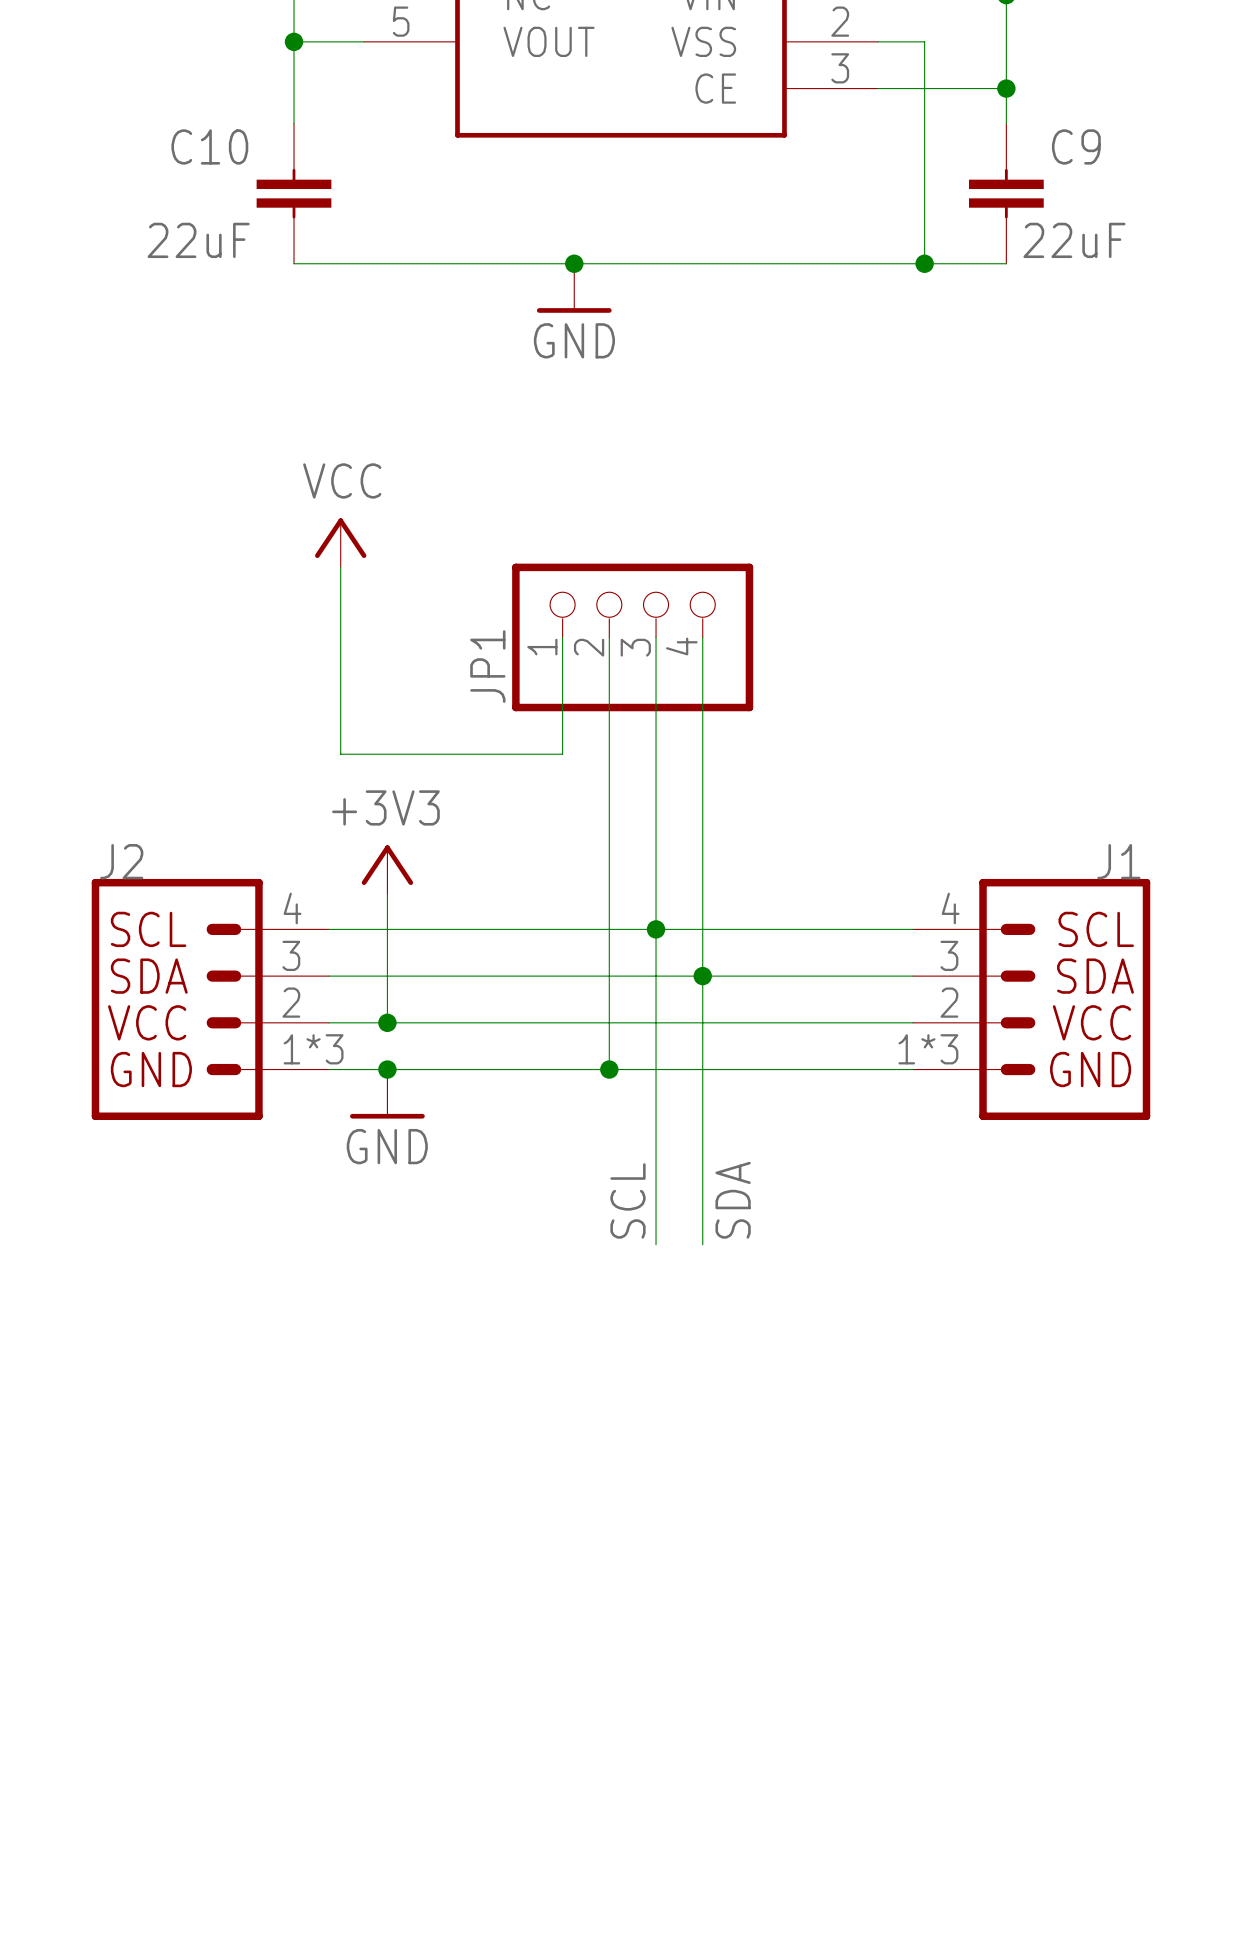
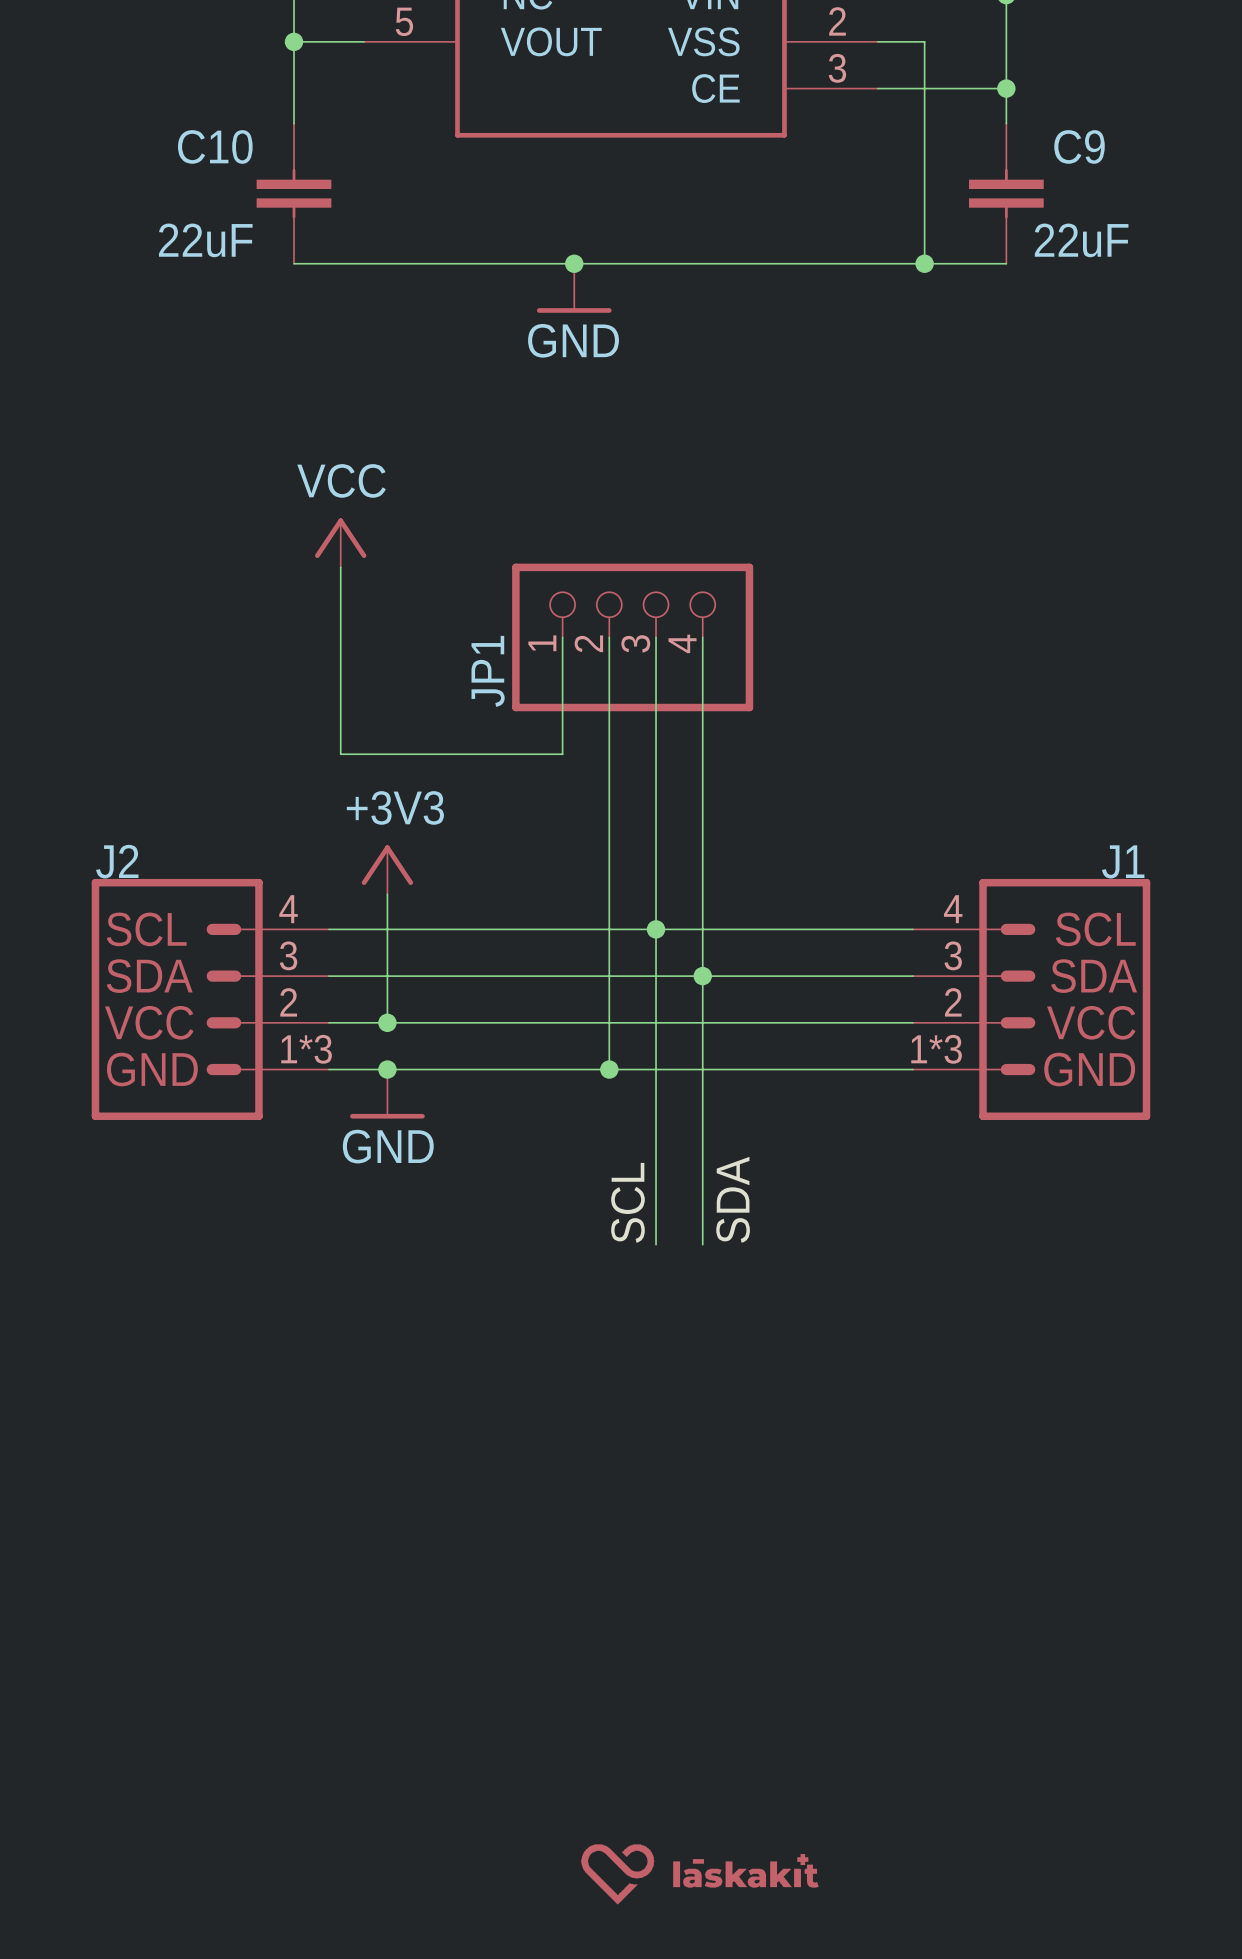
part: none -> (700, 1874)

